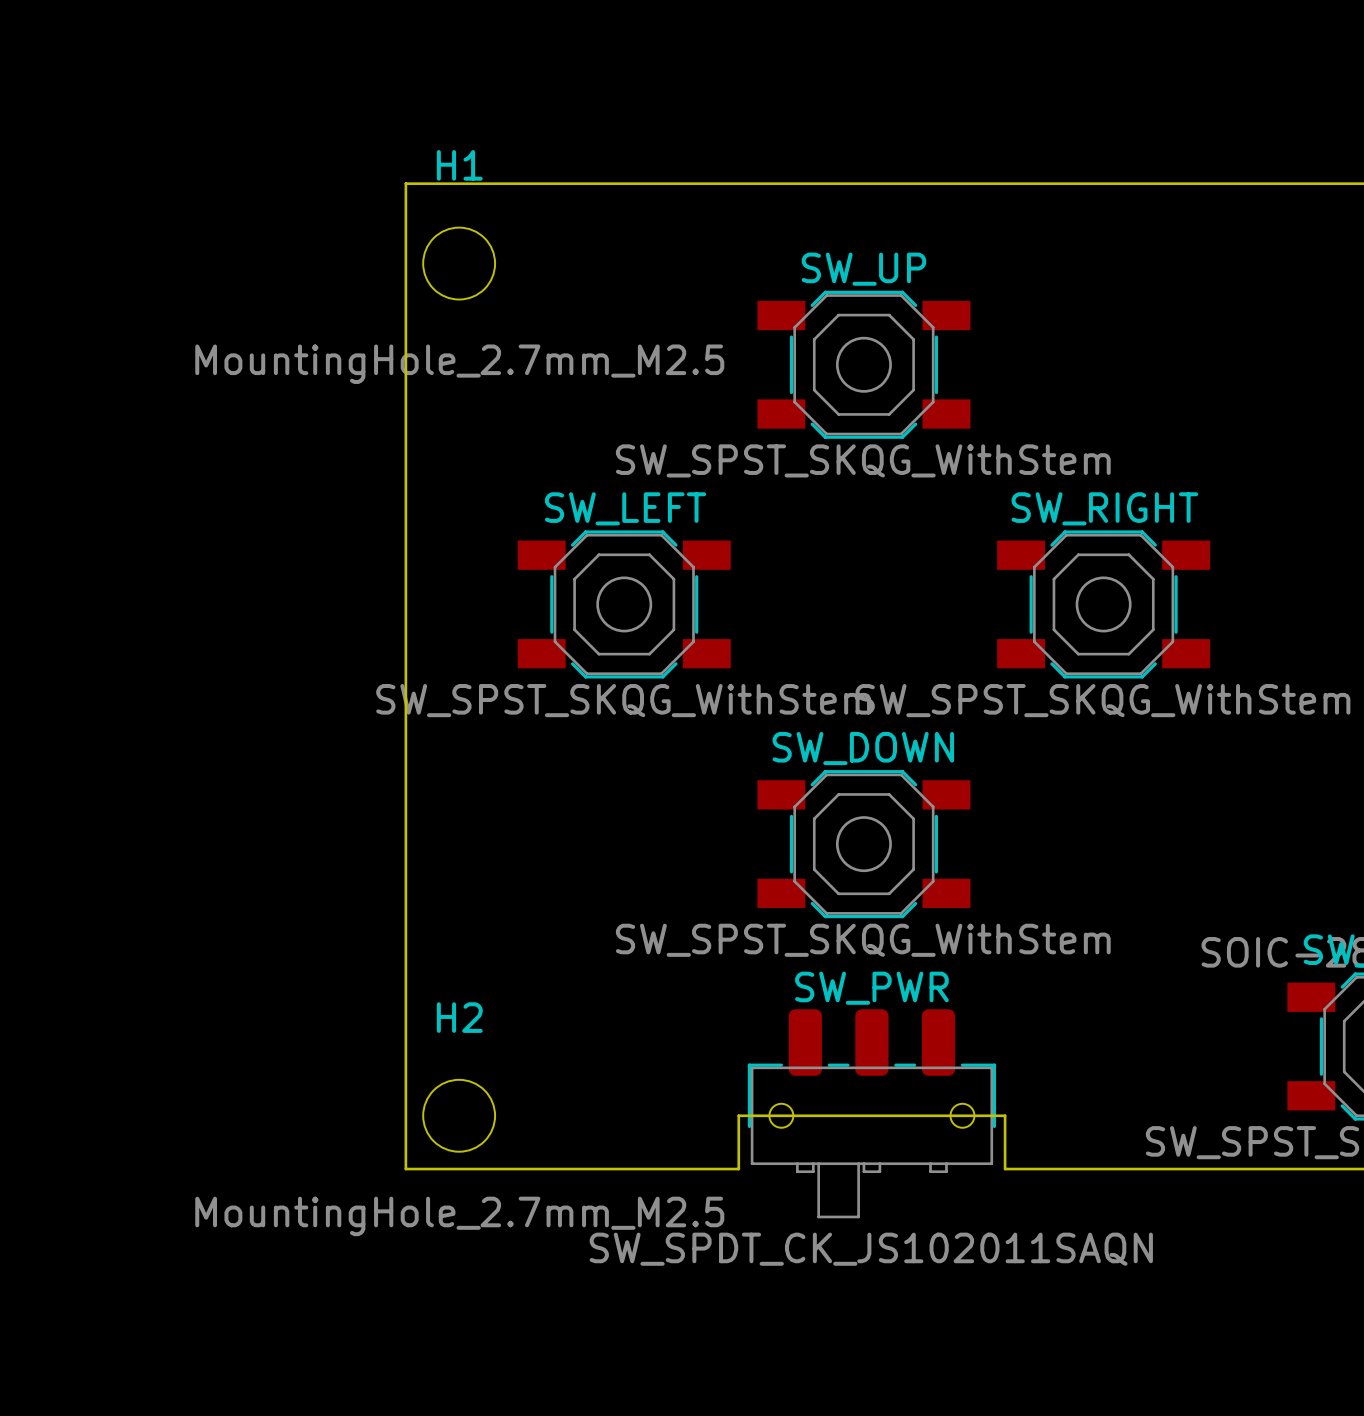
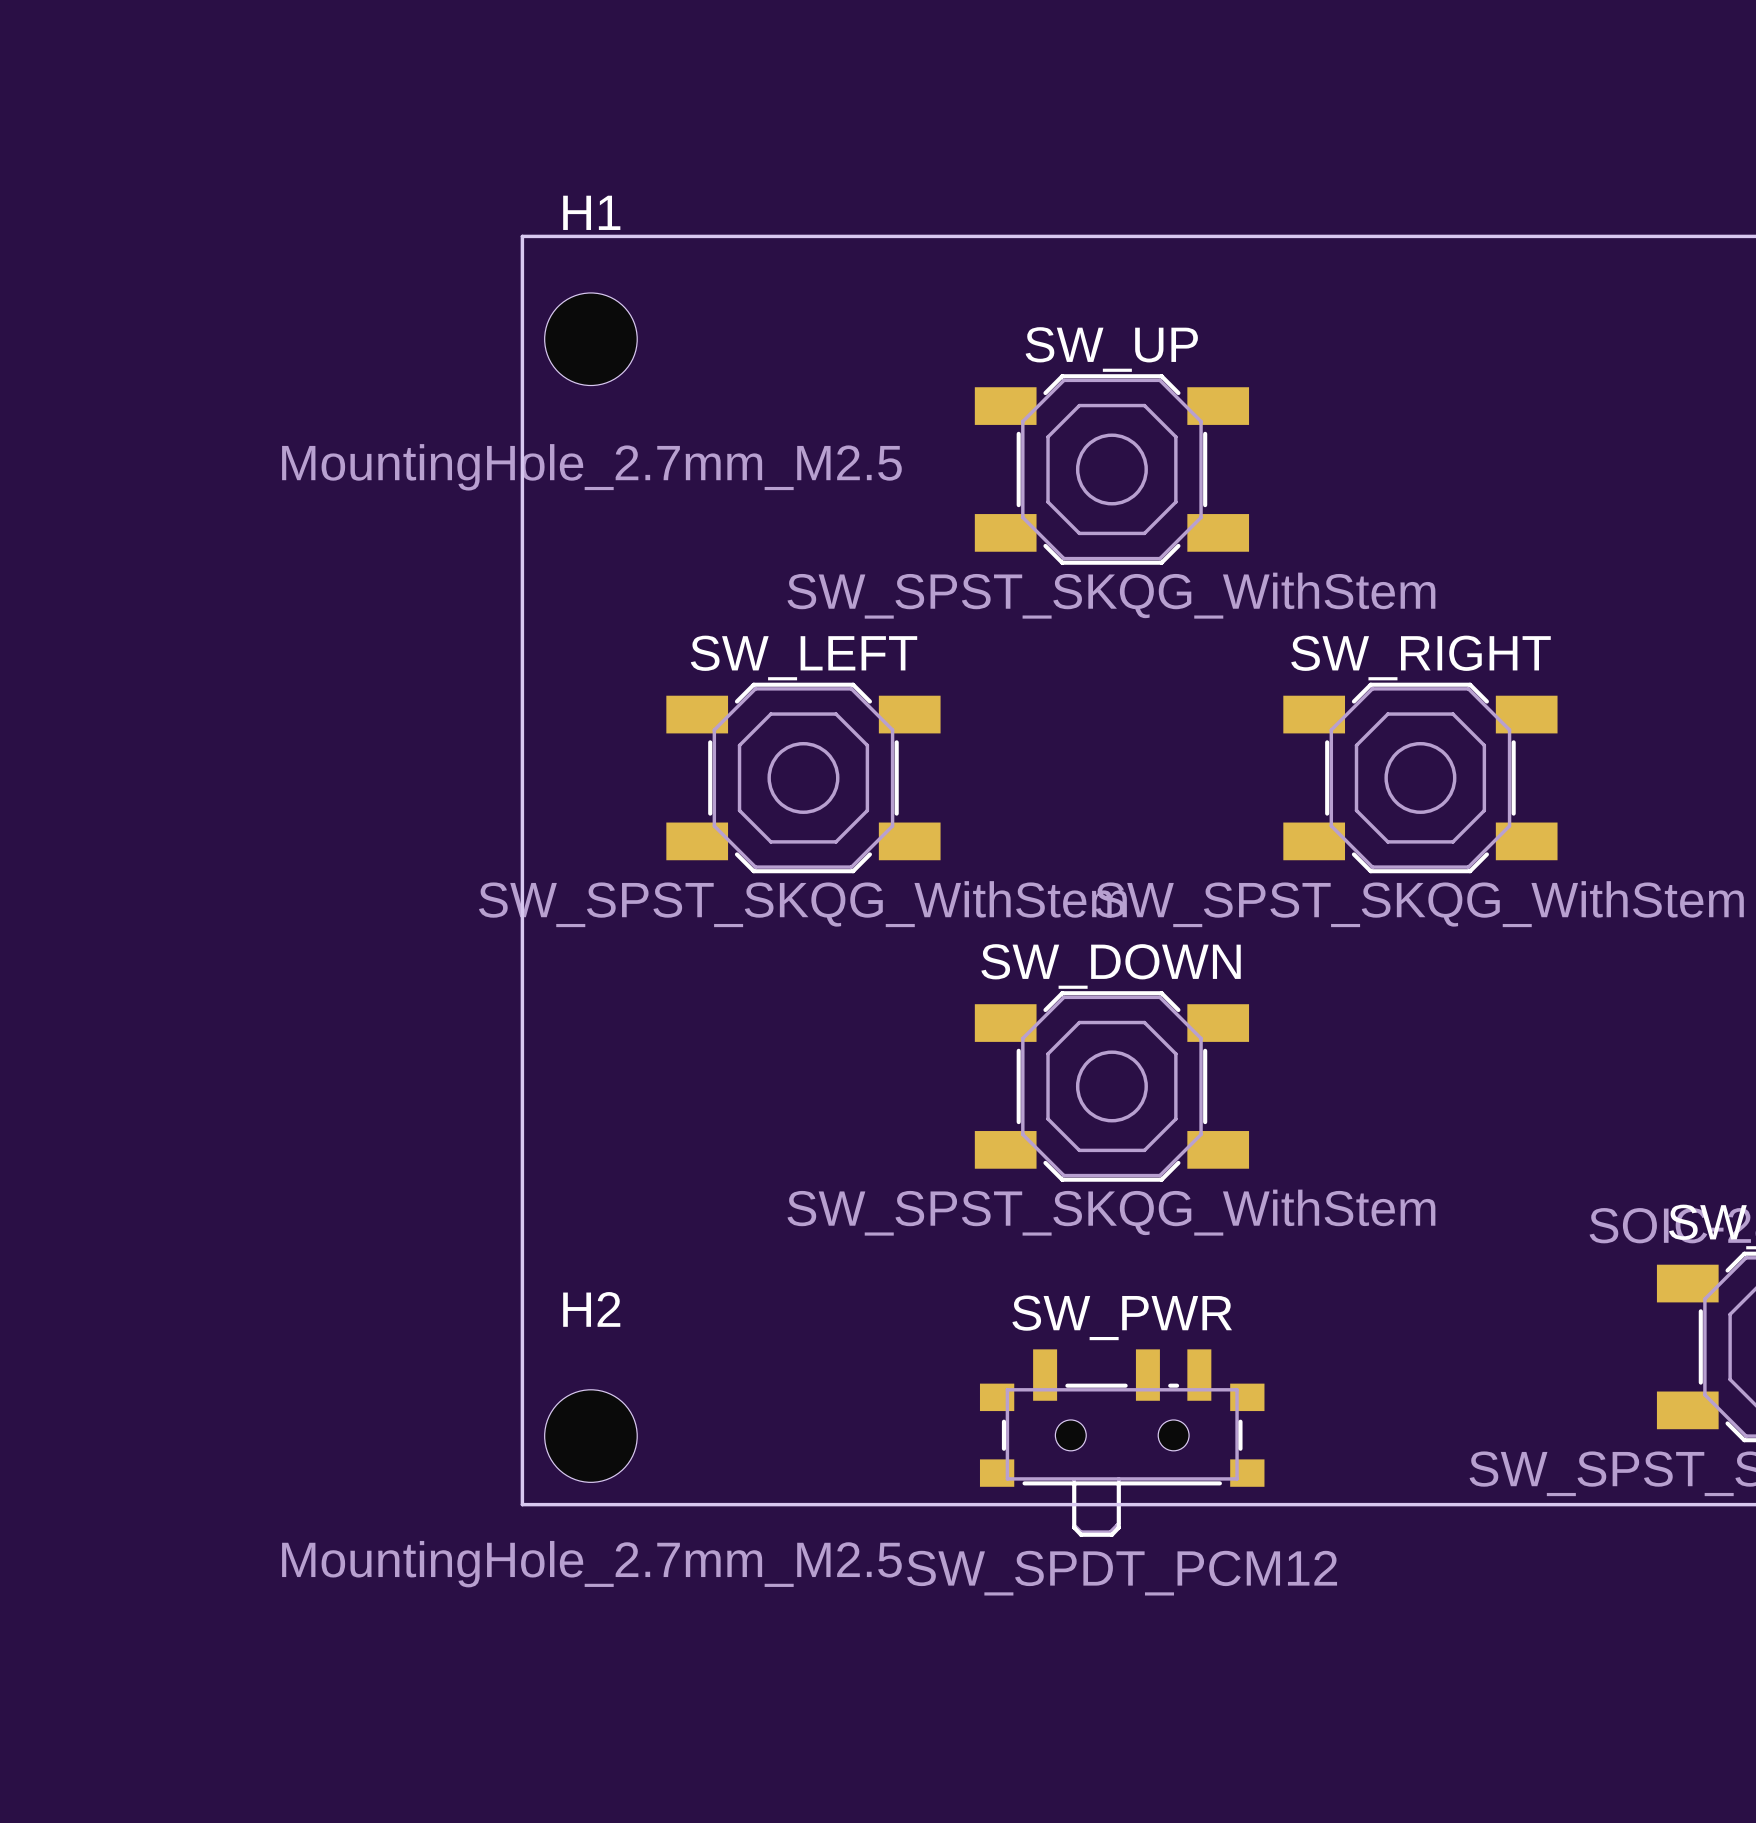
SW_PWR footprint: [747, 1009, 997, 1219] -> [979, 1349, 1265, 1537]
board edge: (738, 1169) (738, 1115) (1005, 1115) (1005, 1169) -> (950, 1504) (1293, 1504)
SW_PWR value: SW_SPDT_CK_JS102011SAQN (871, 1249) -> SW_SPDT_PCM12 (1122, 1573)

